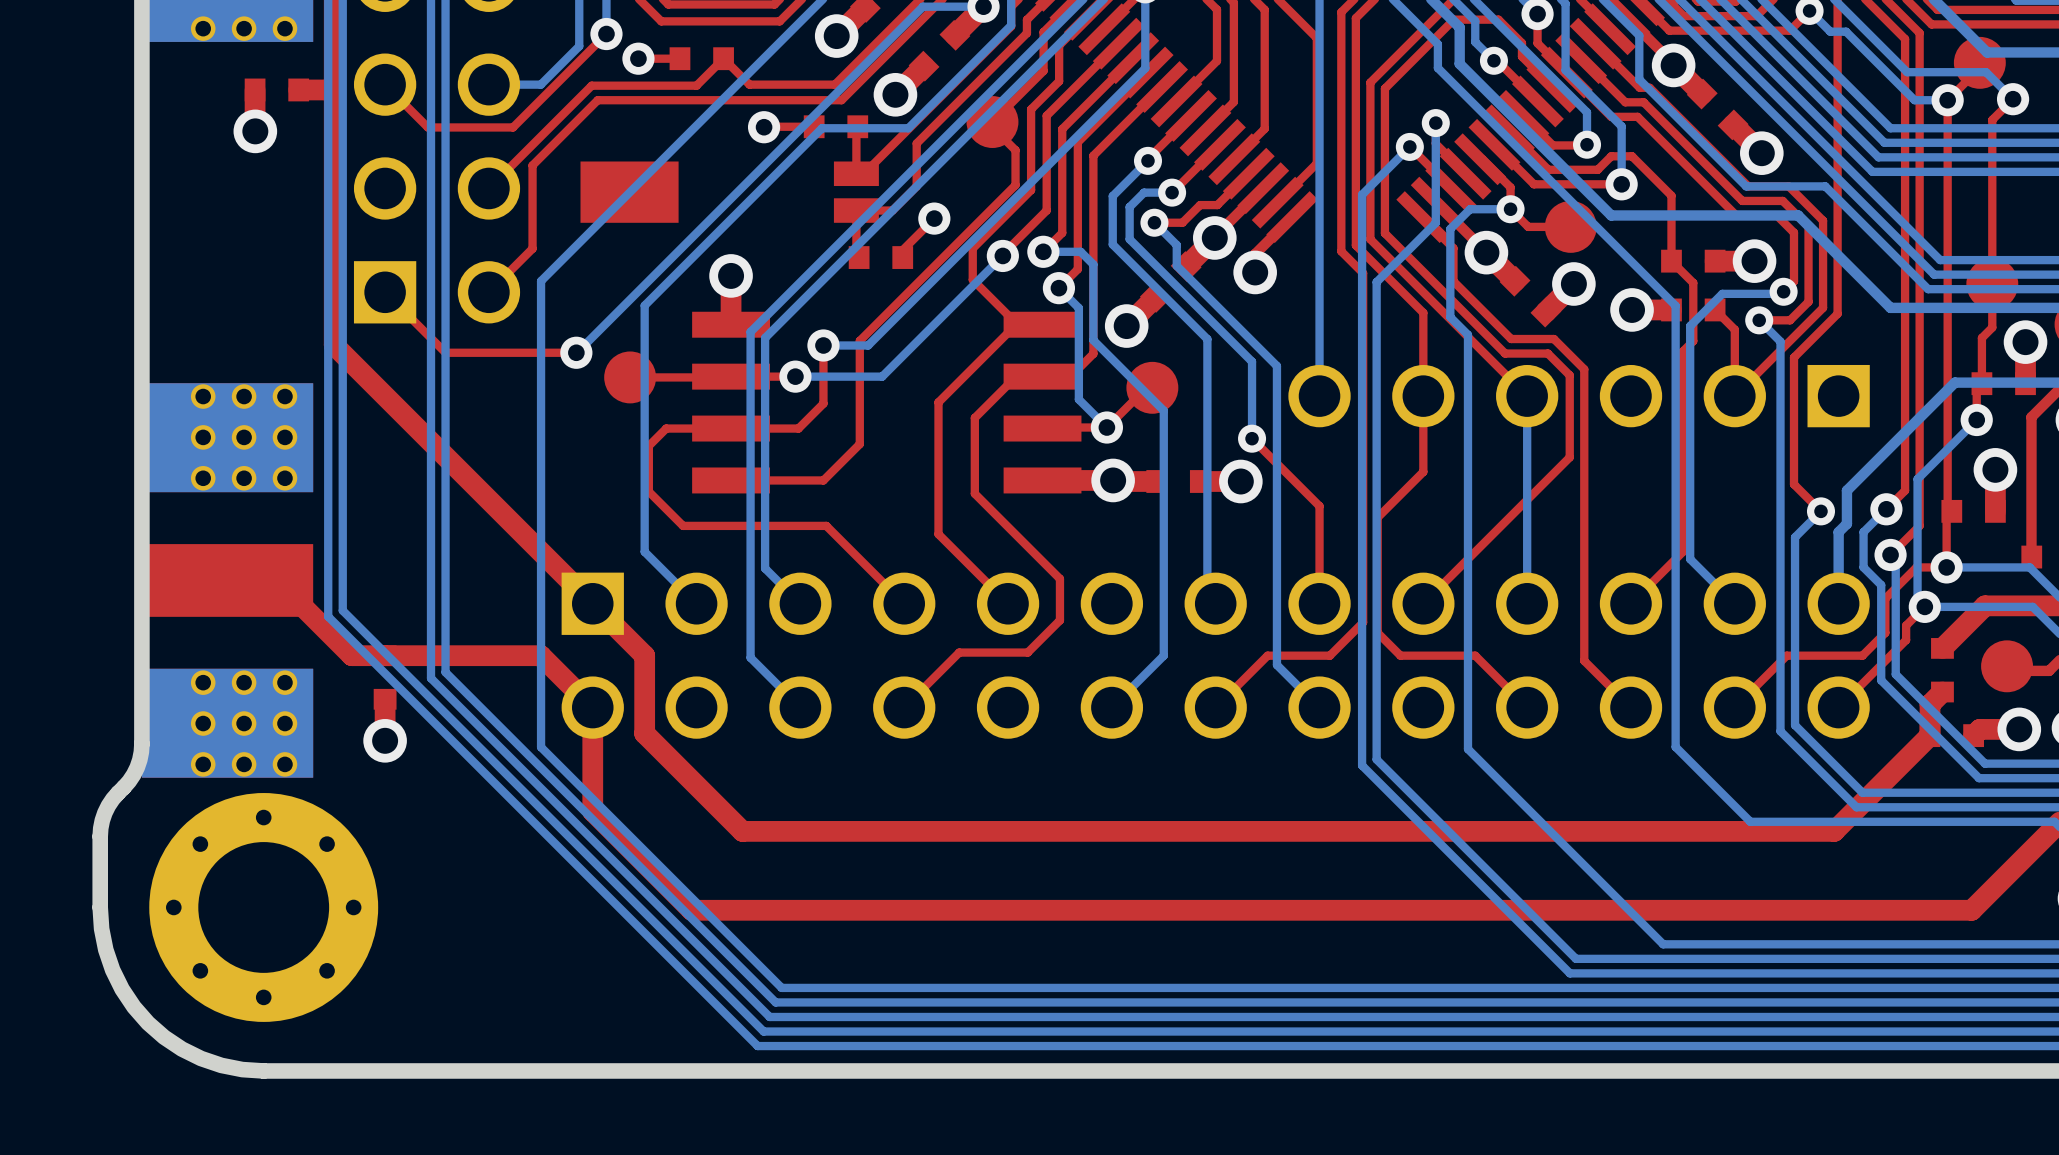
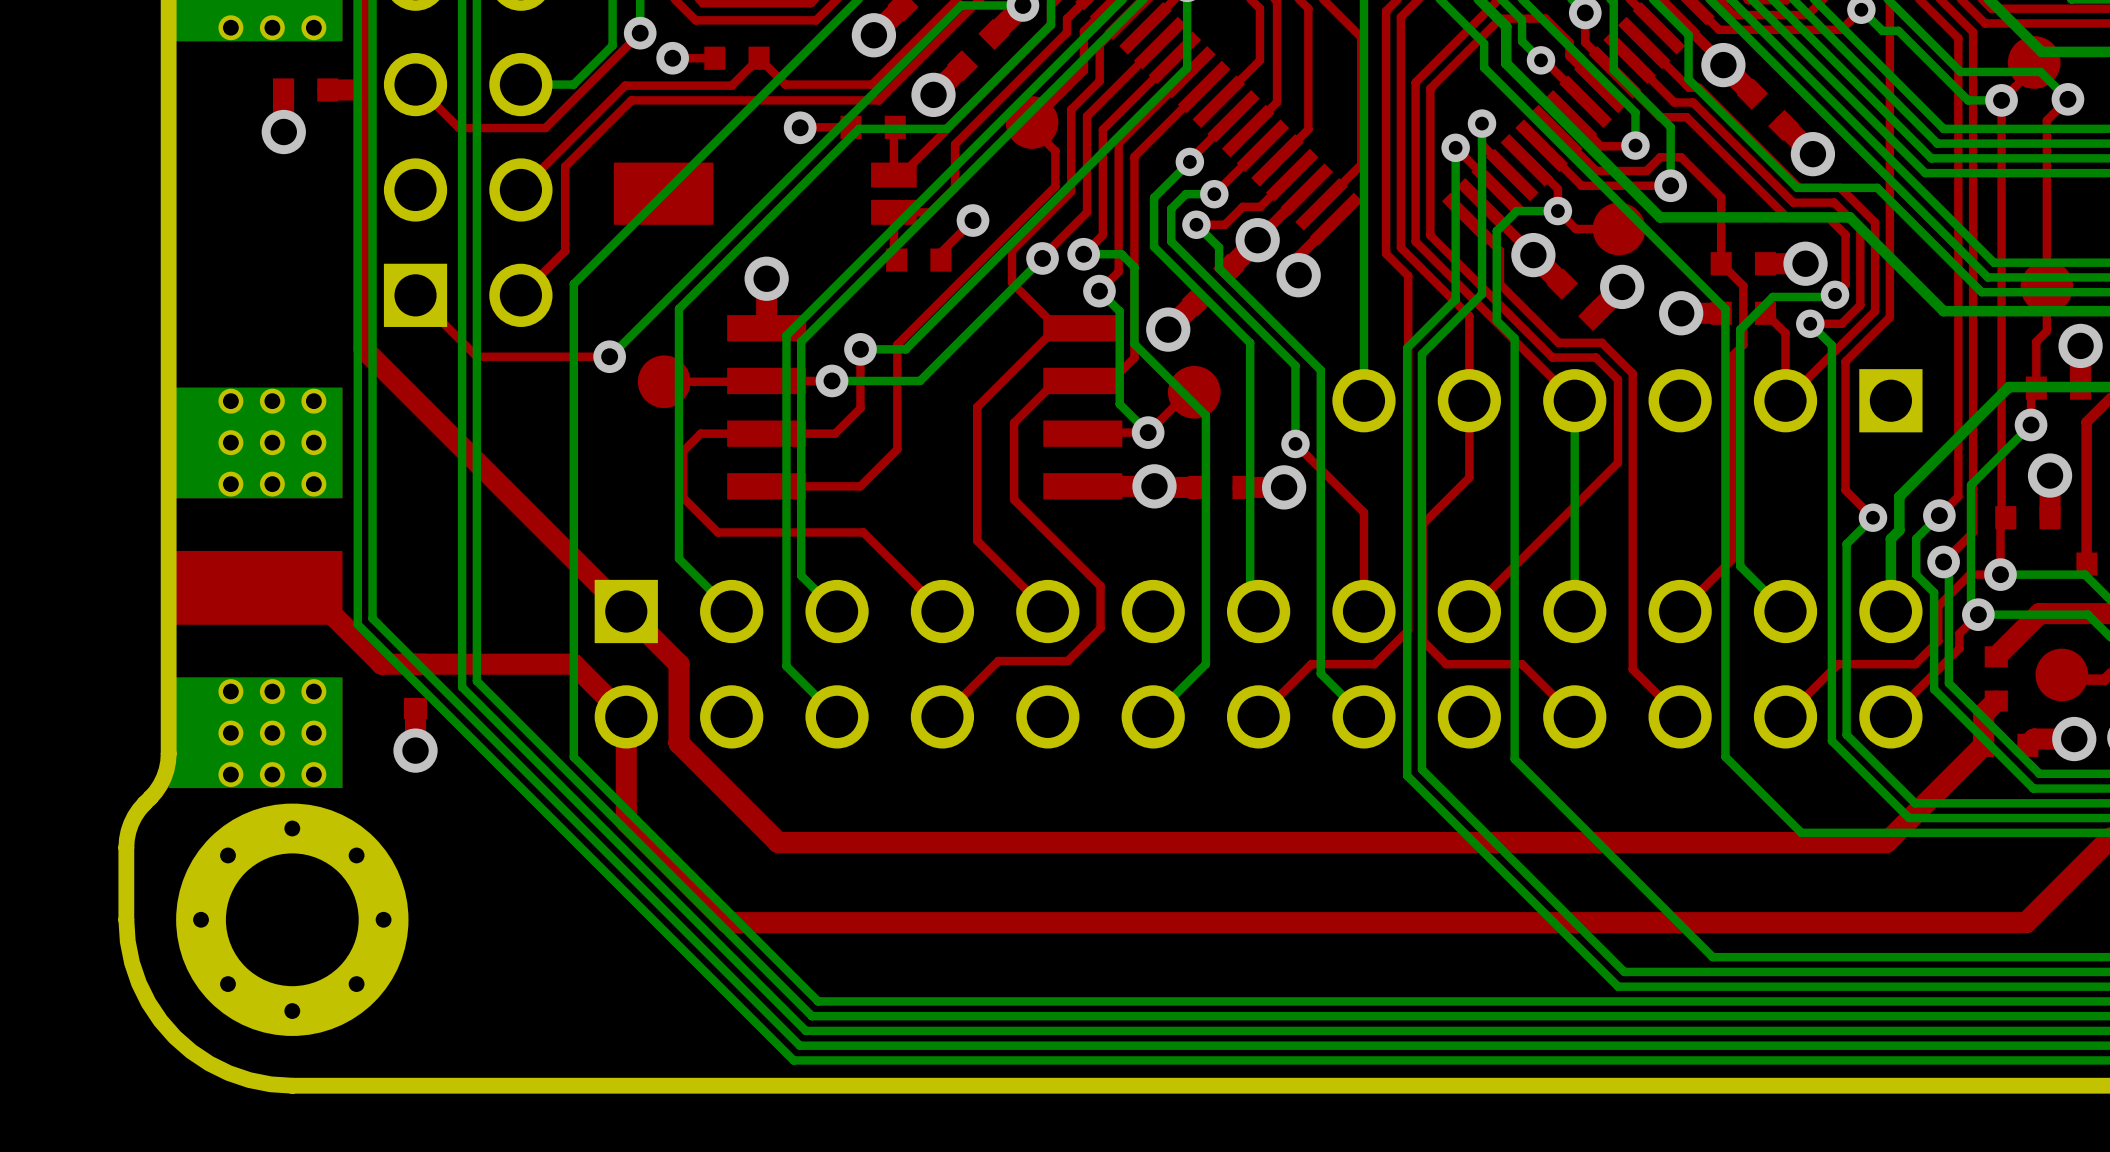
bottom track: (1409, 146) (1362, 194) (1362, 344) -> (1455, 147) (1455, 299) (1407, 348)
bottom track: (1435, 222) (1376, 282) (1376, 350) -> (1482, 224) (1482, 294) (1421, 354)

